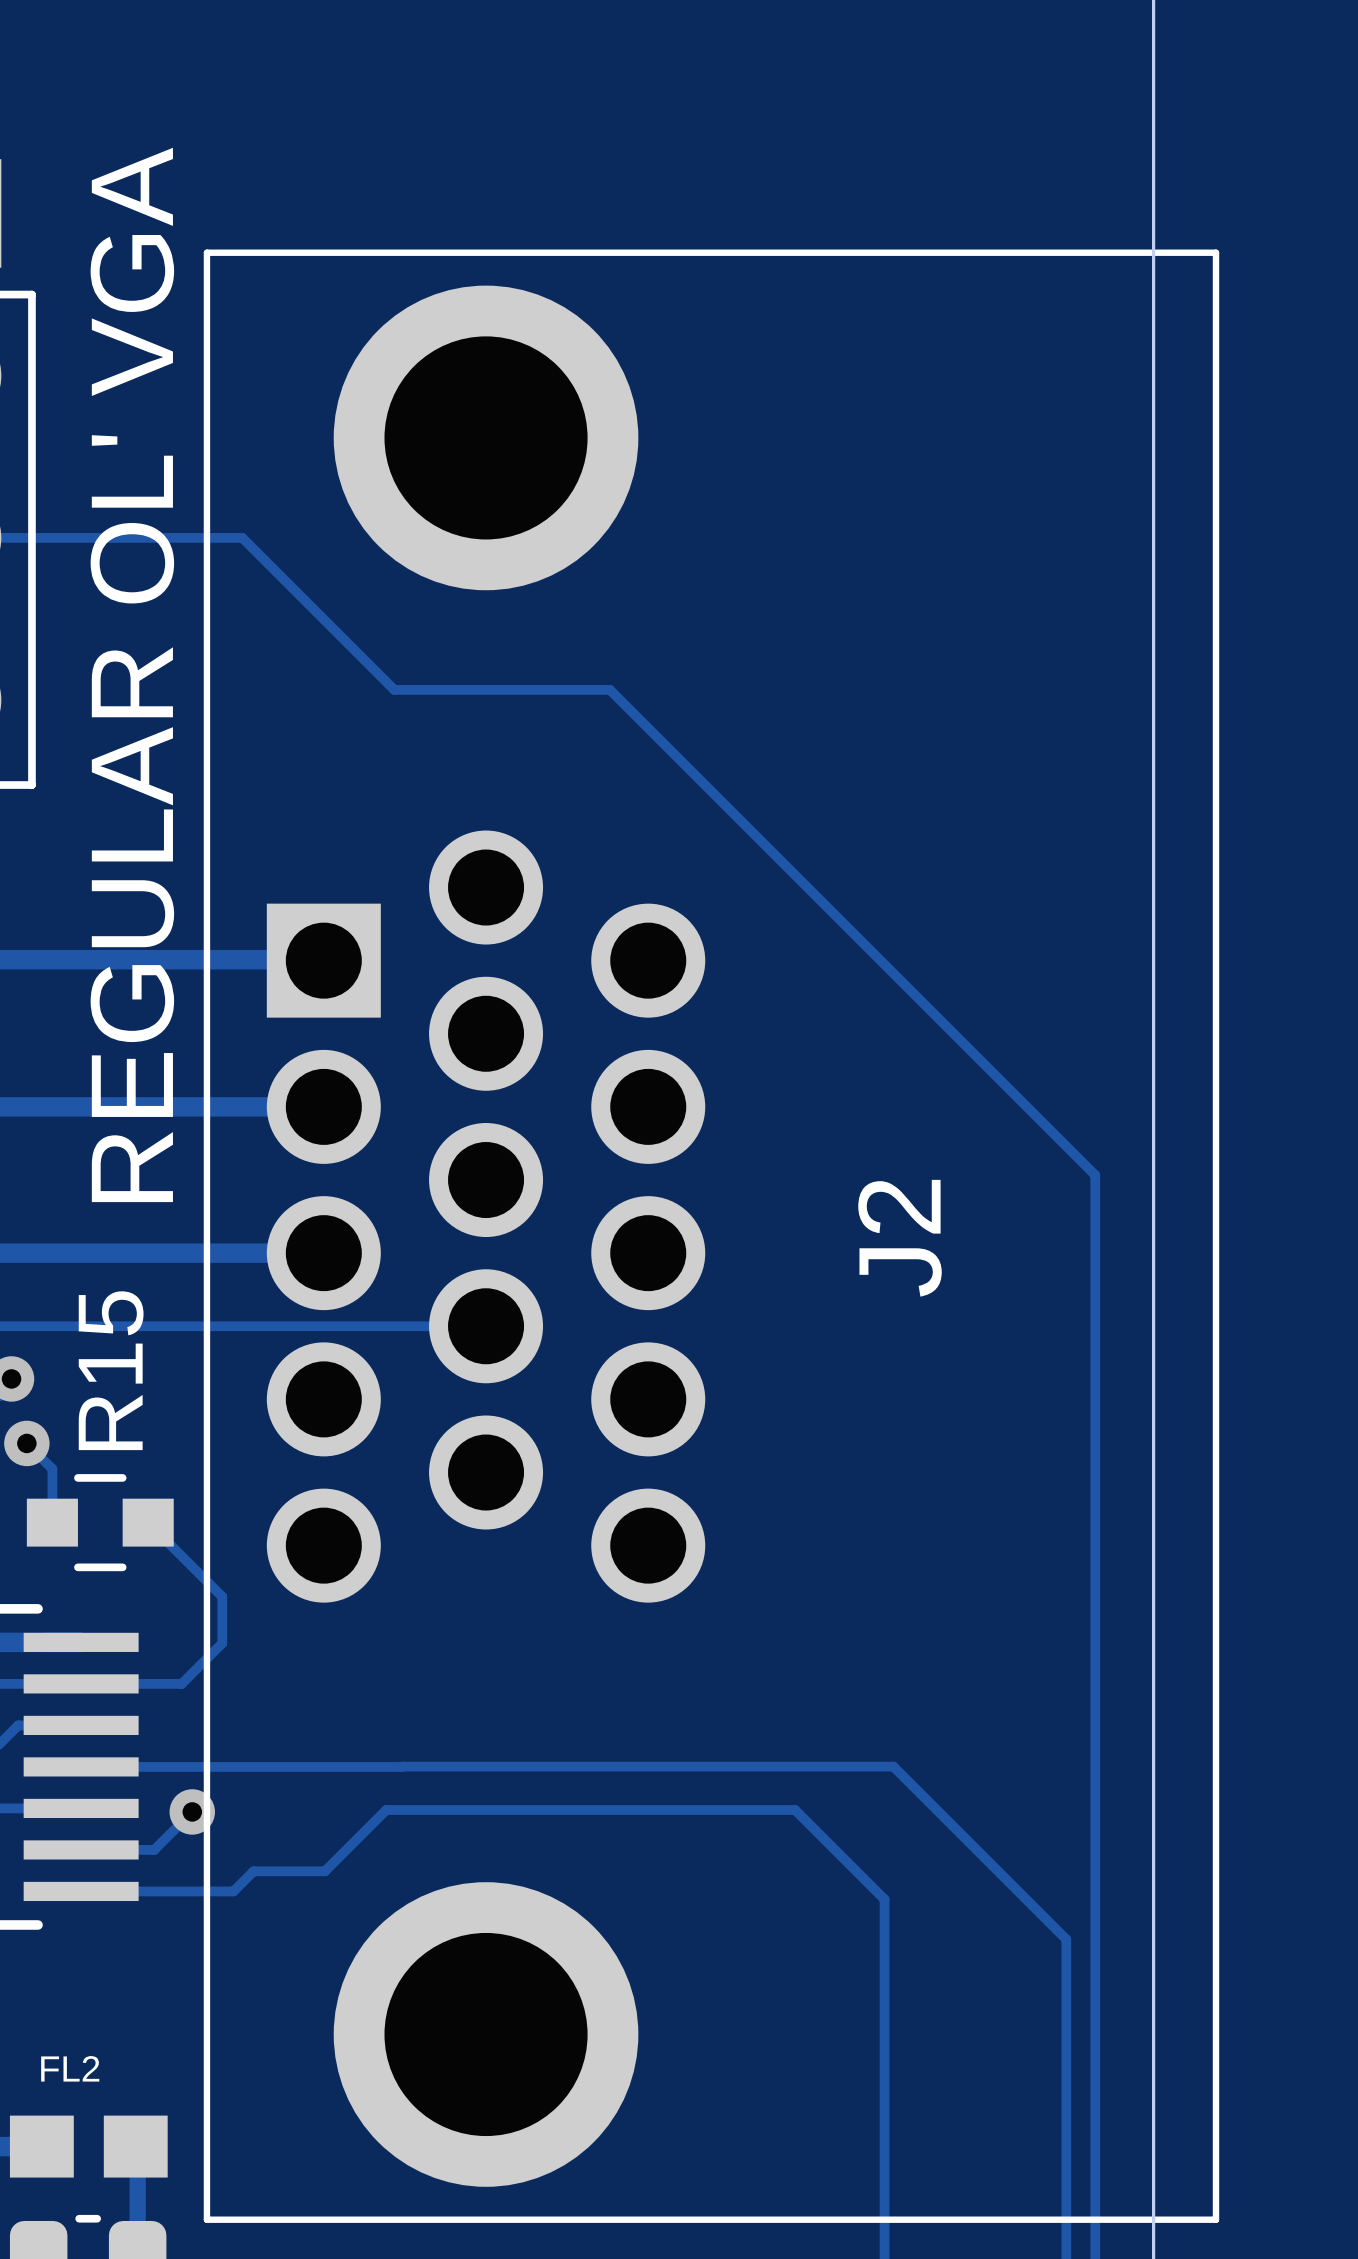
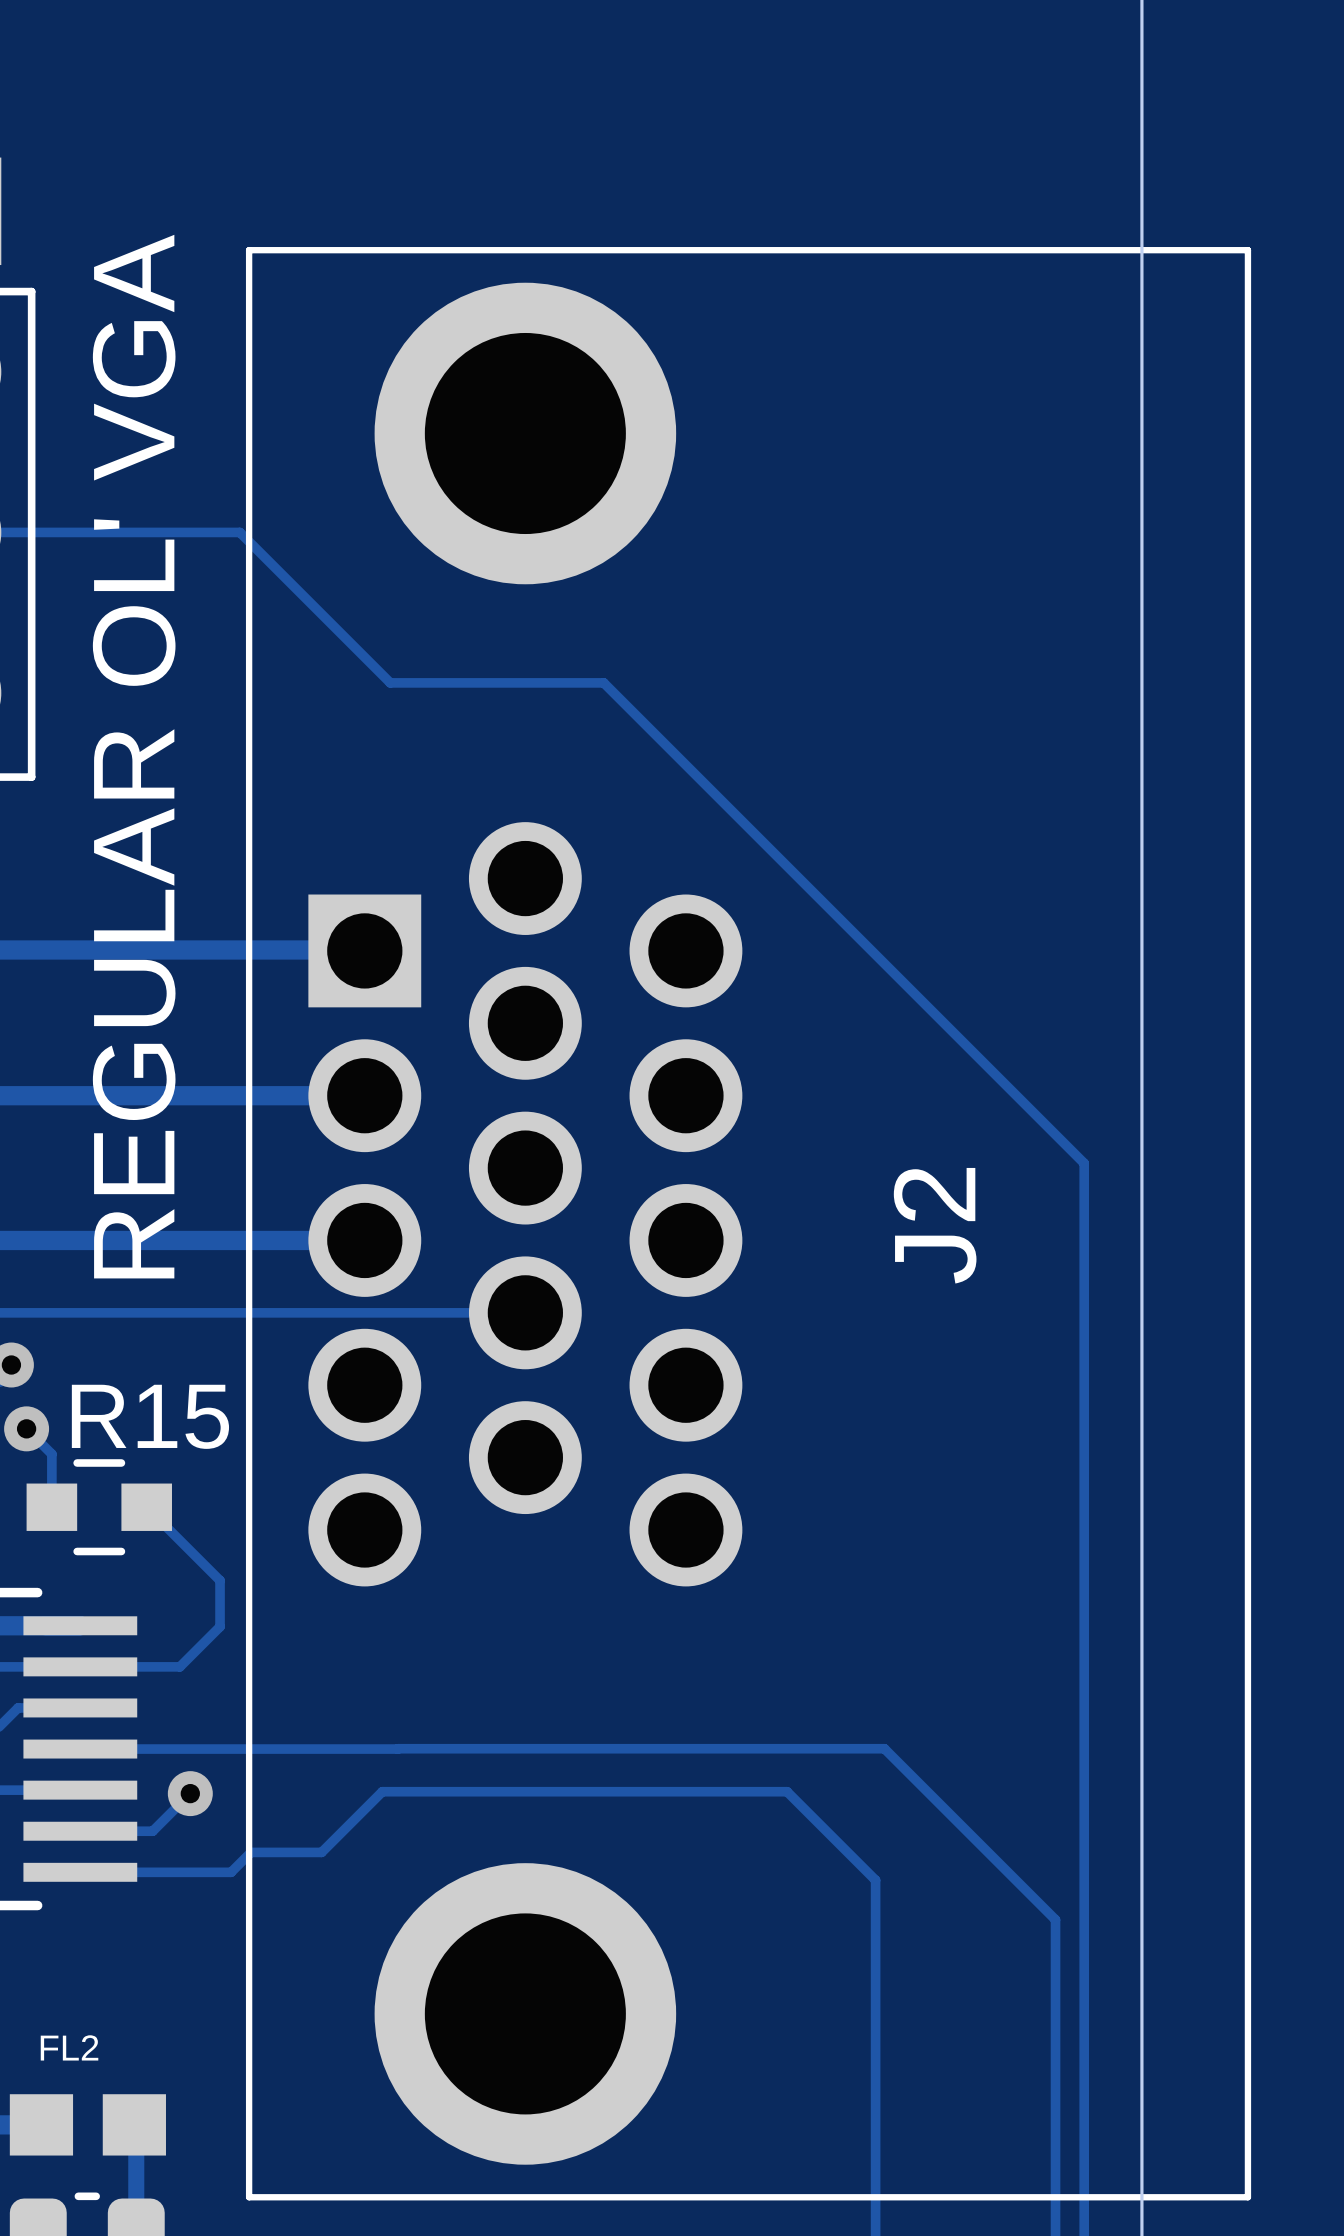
text position: REGULAR OL' VGA (132, 674) -> REGULAR OL' VGA (134, 756)
J2 position: (711, 1236) -> (748, 1223)
R15 name rotation: 0° (111, 1370) -> 90° clockwise (150, 1416)

